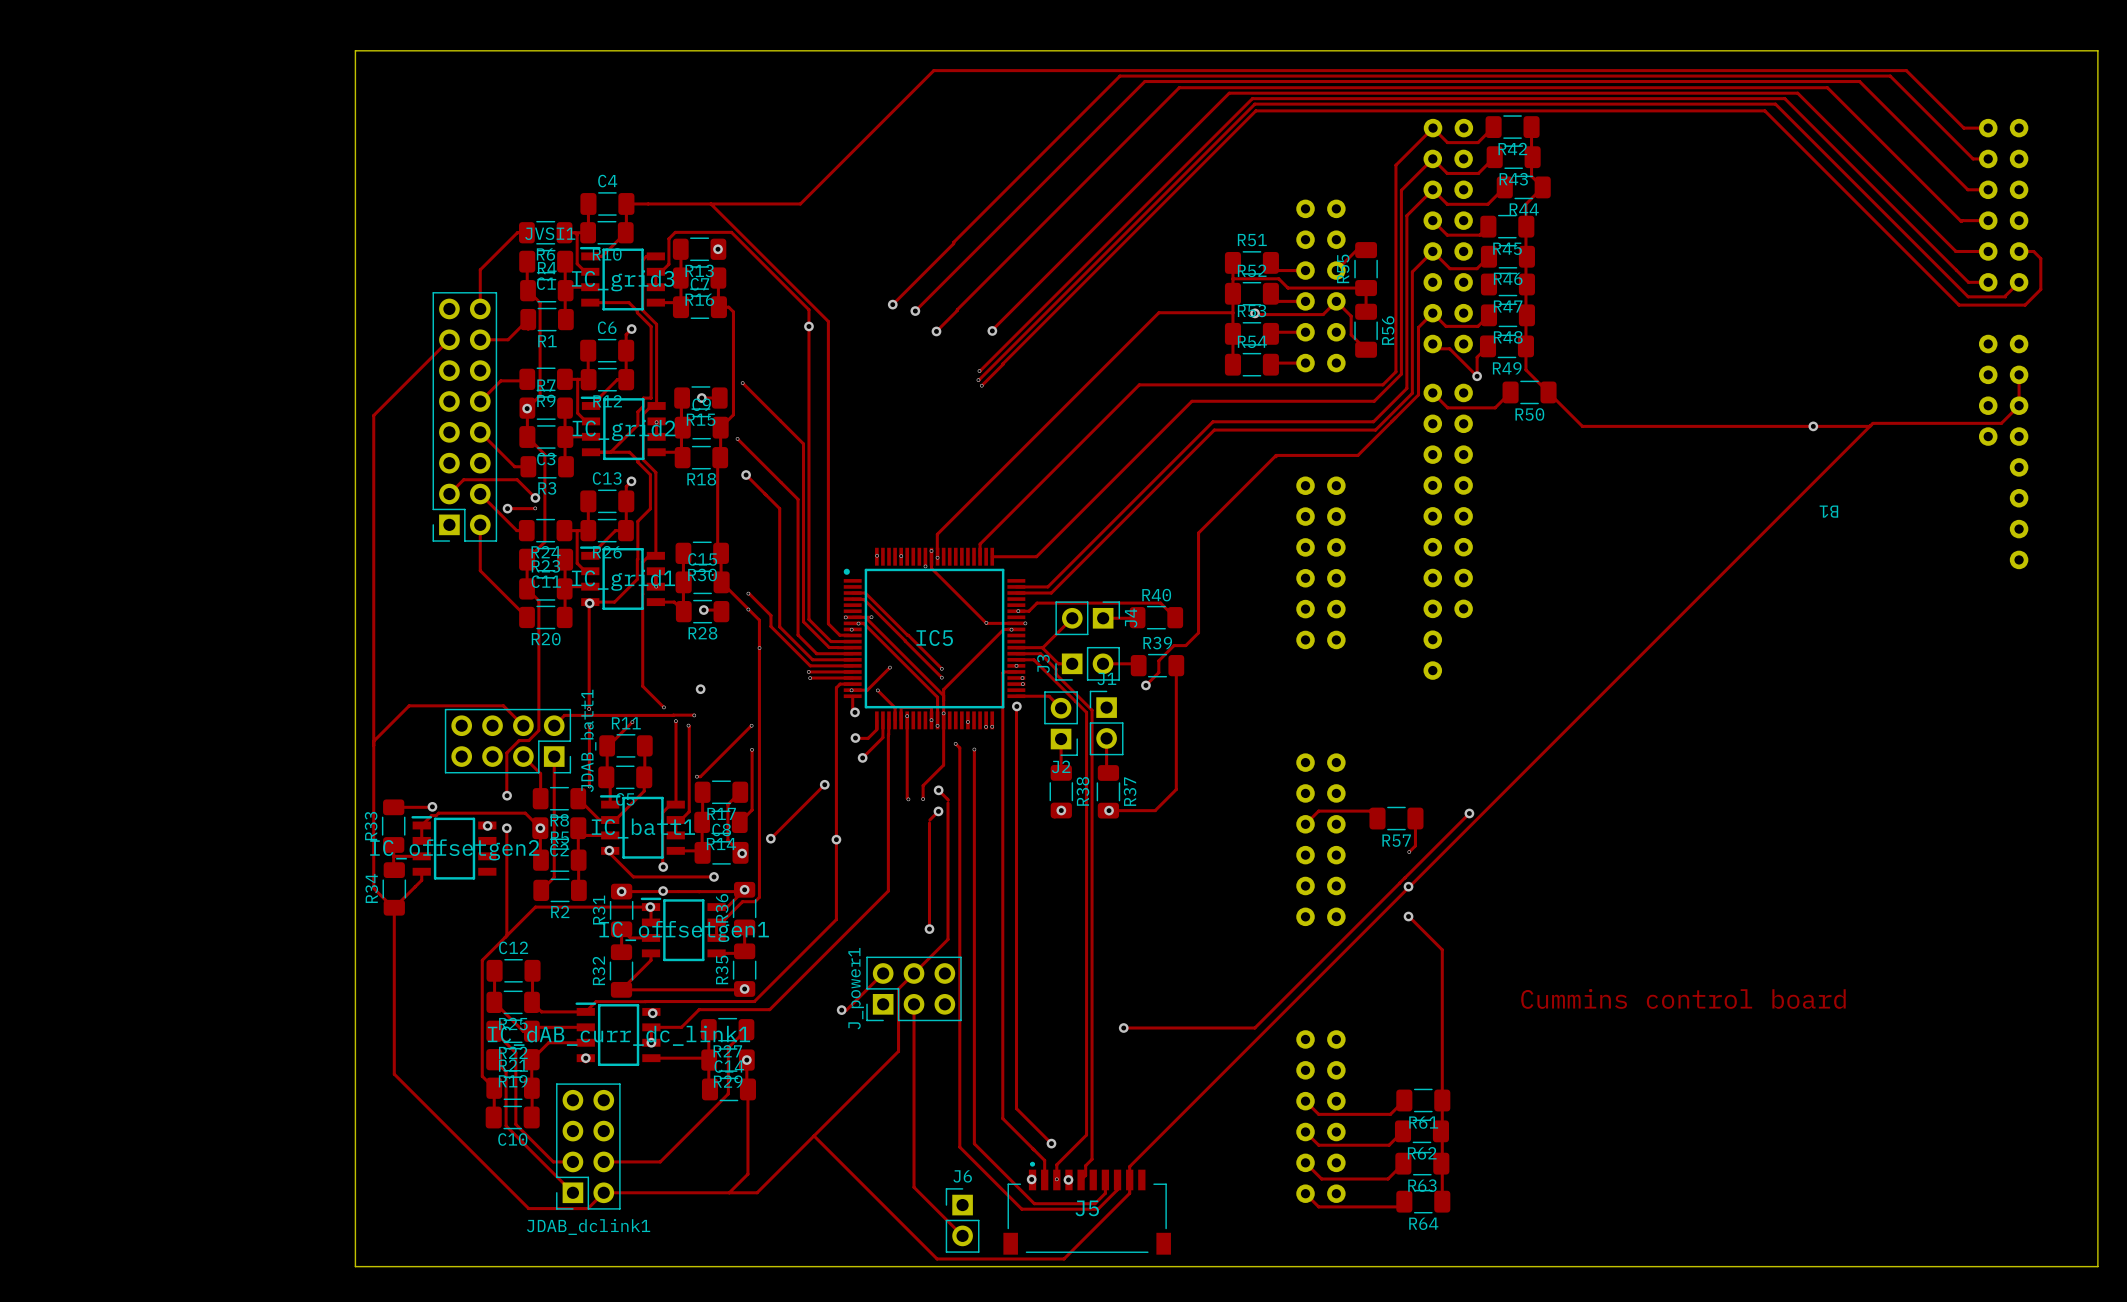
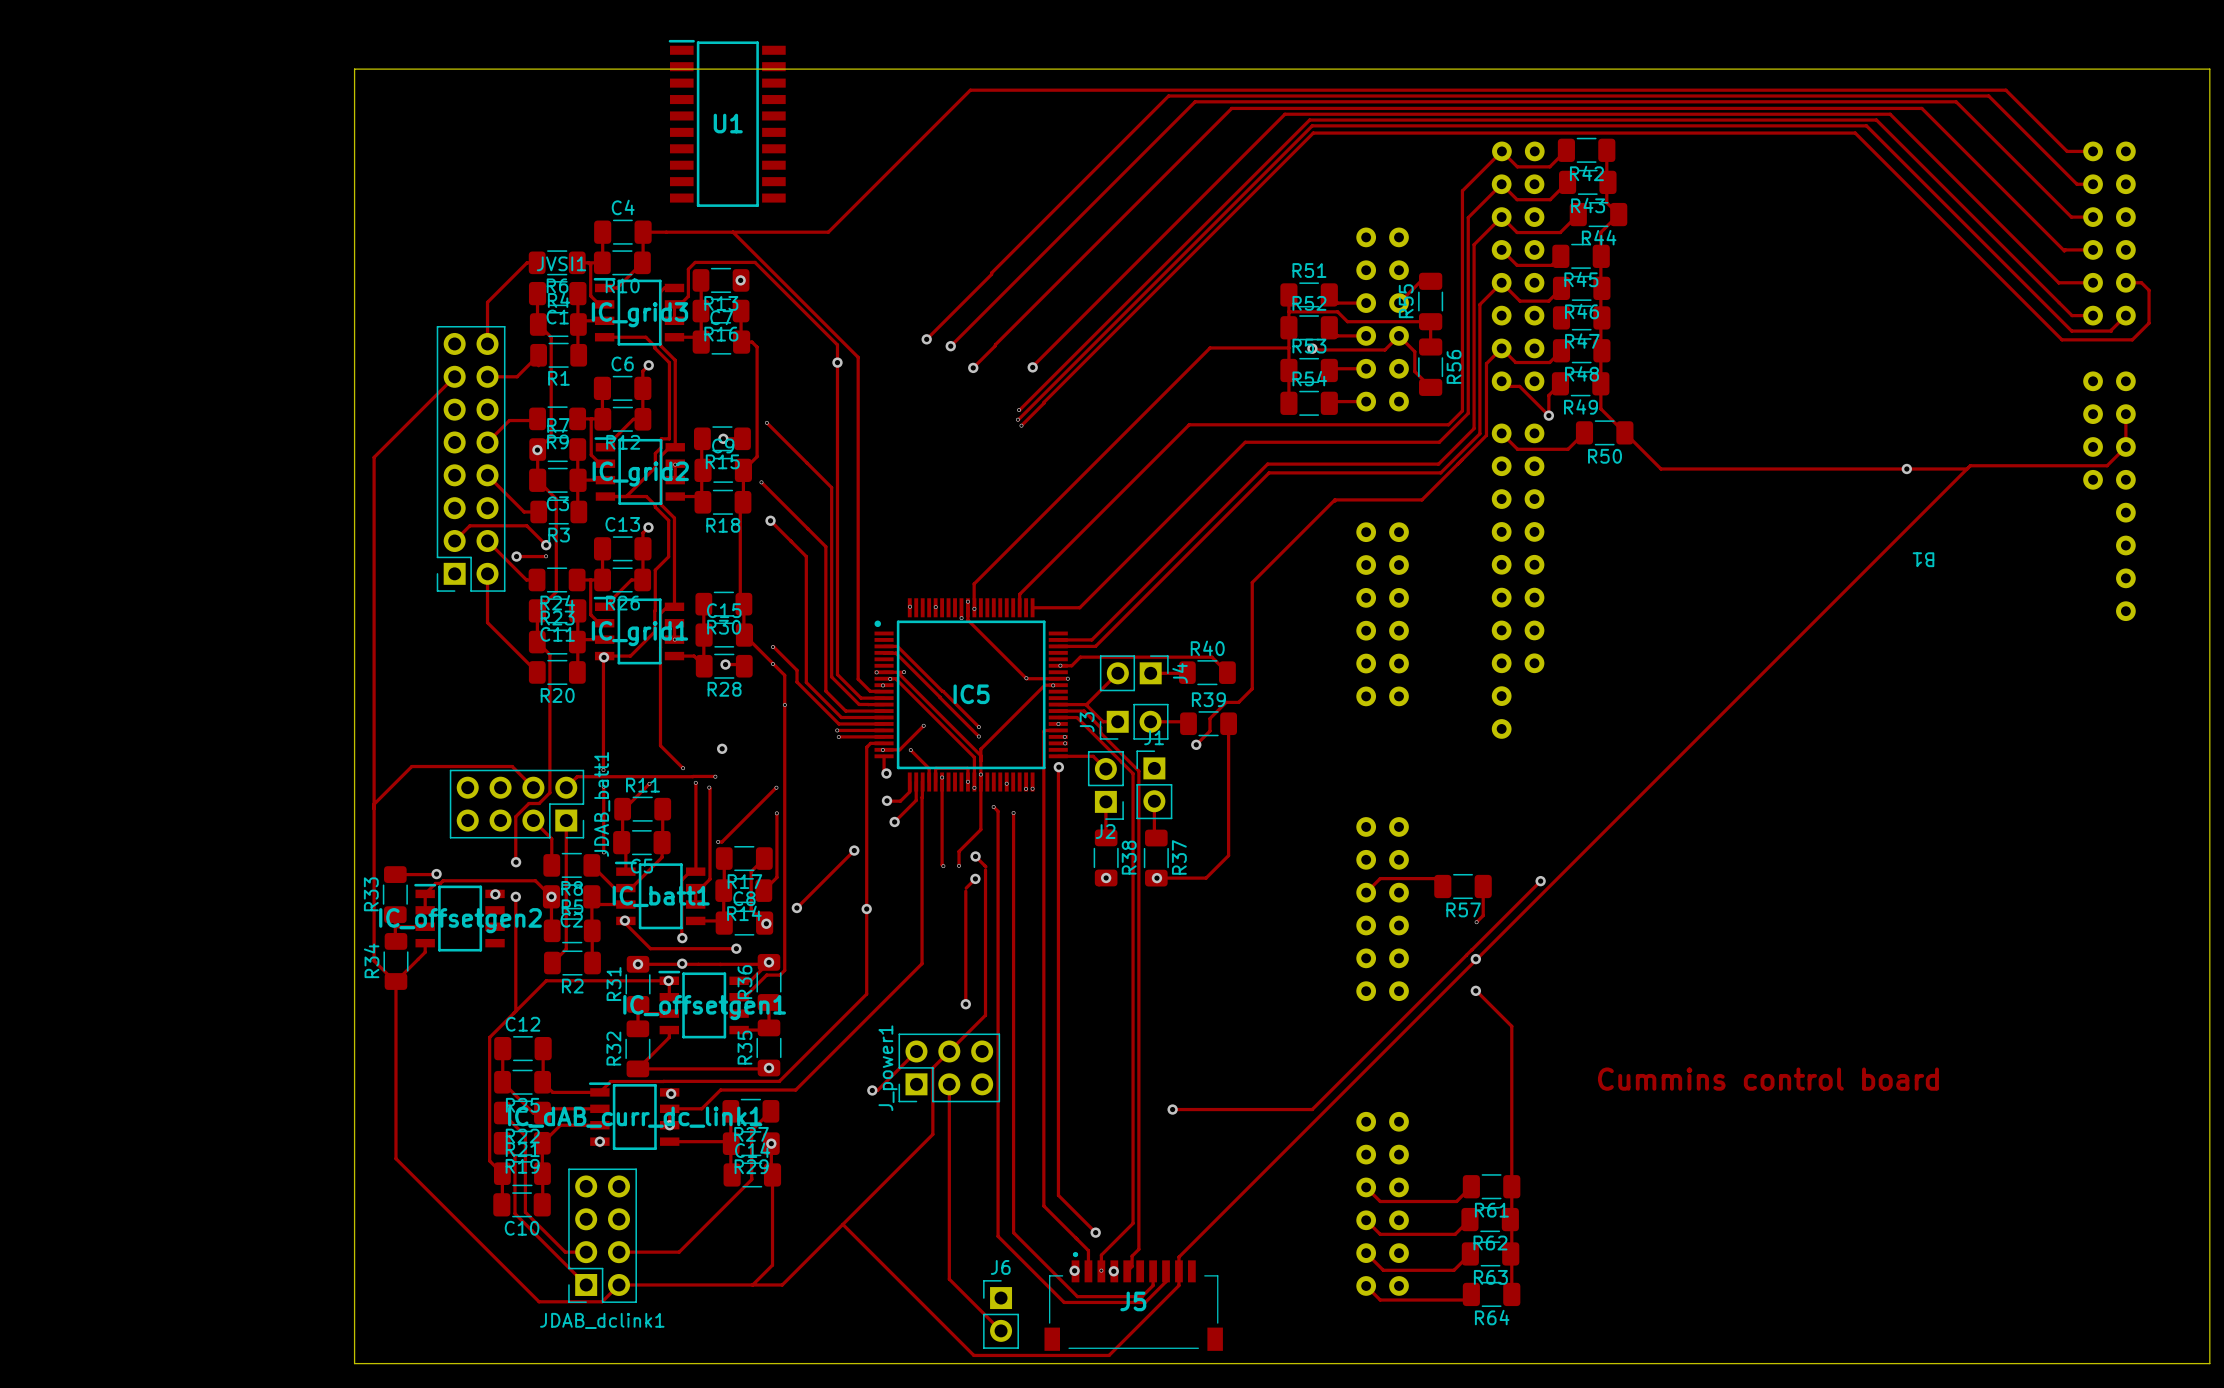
U1: none -> (727, 123)

